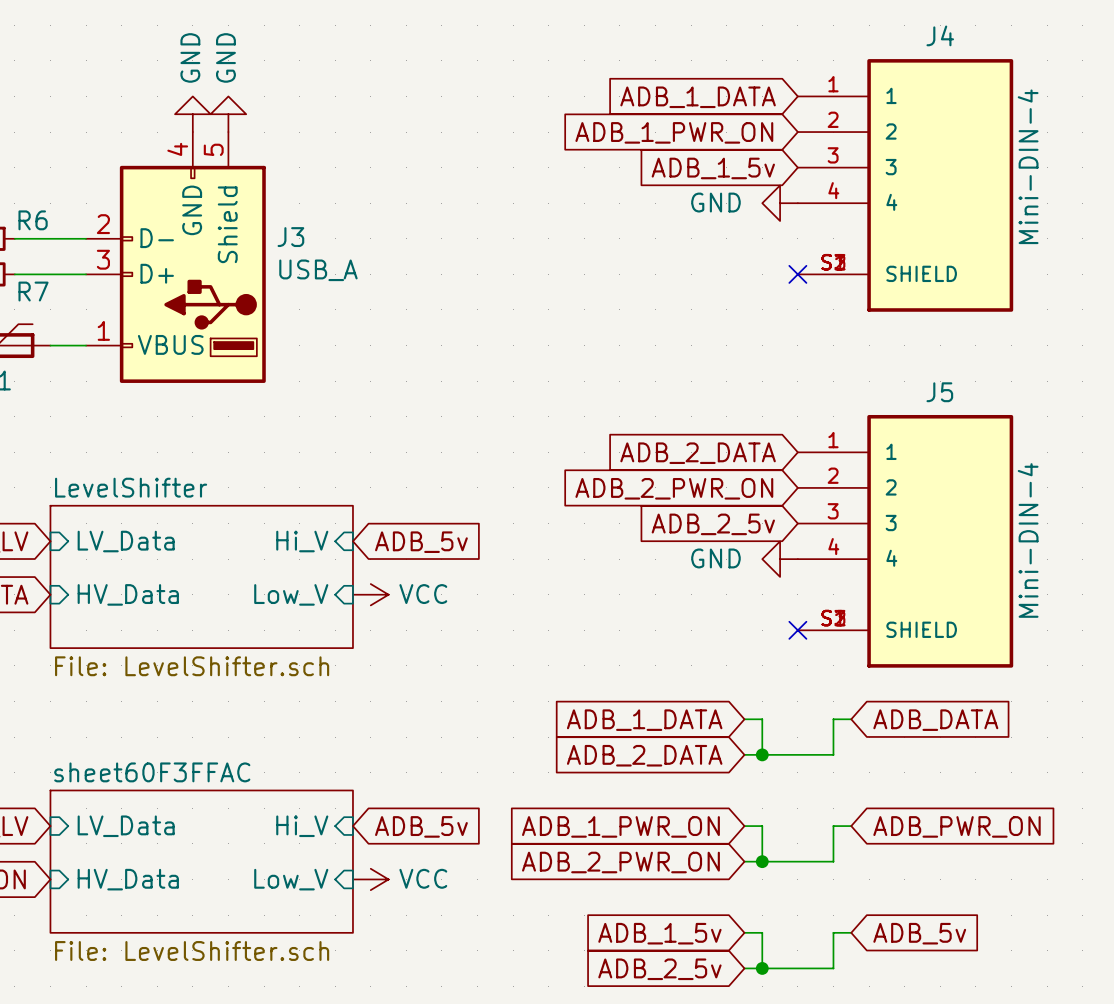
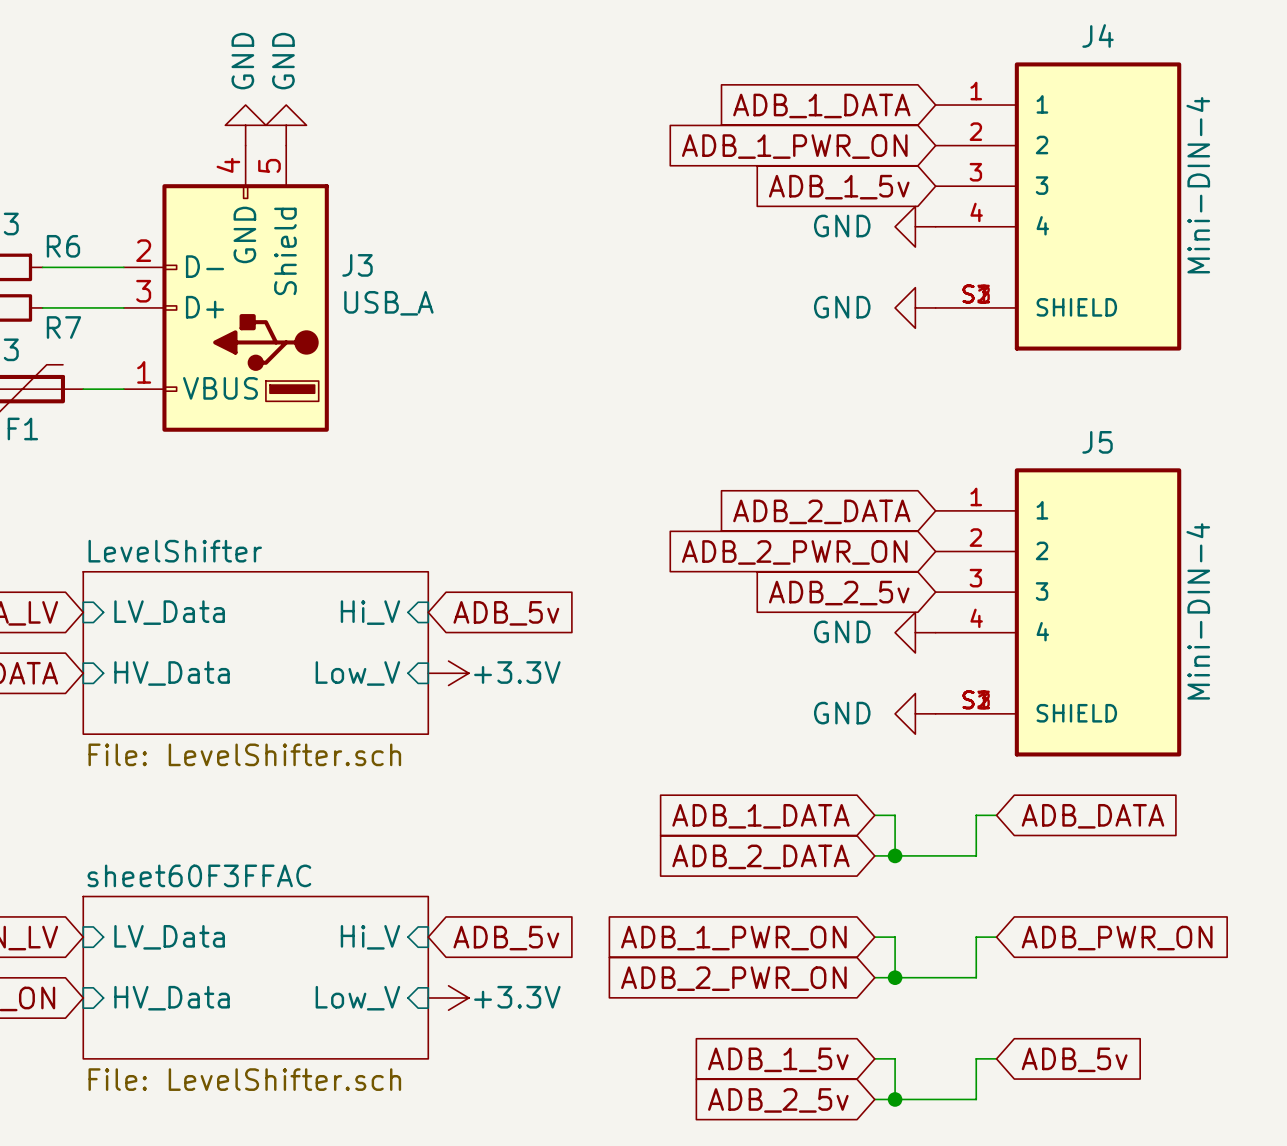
power symbol: none -> GND (915, 307)
no-connect mark: (797, 274) -> none
power symbol: VCC (370, 594) -> +3.3V (448, 673)
power symbol: none -> GND (915, 713)
no-connect mark: (797, 630) -> none
power symbol: VCC (370, 879) -> +3.3V (448, 997)

